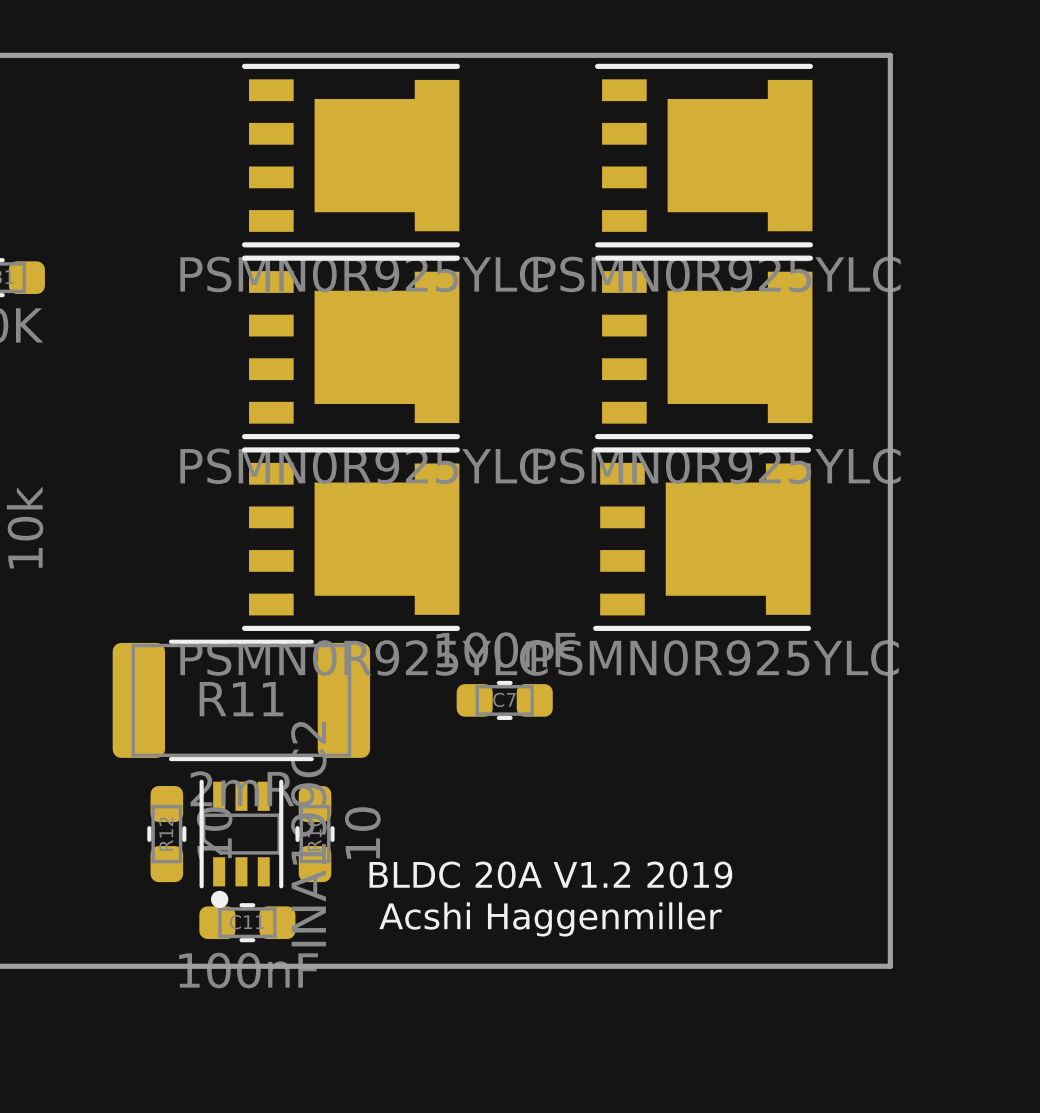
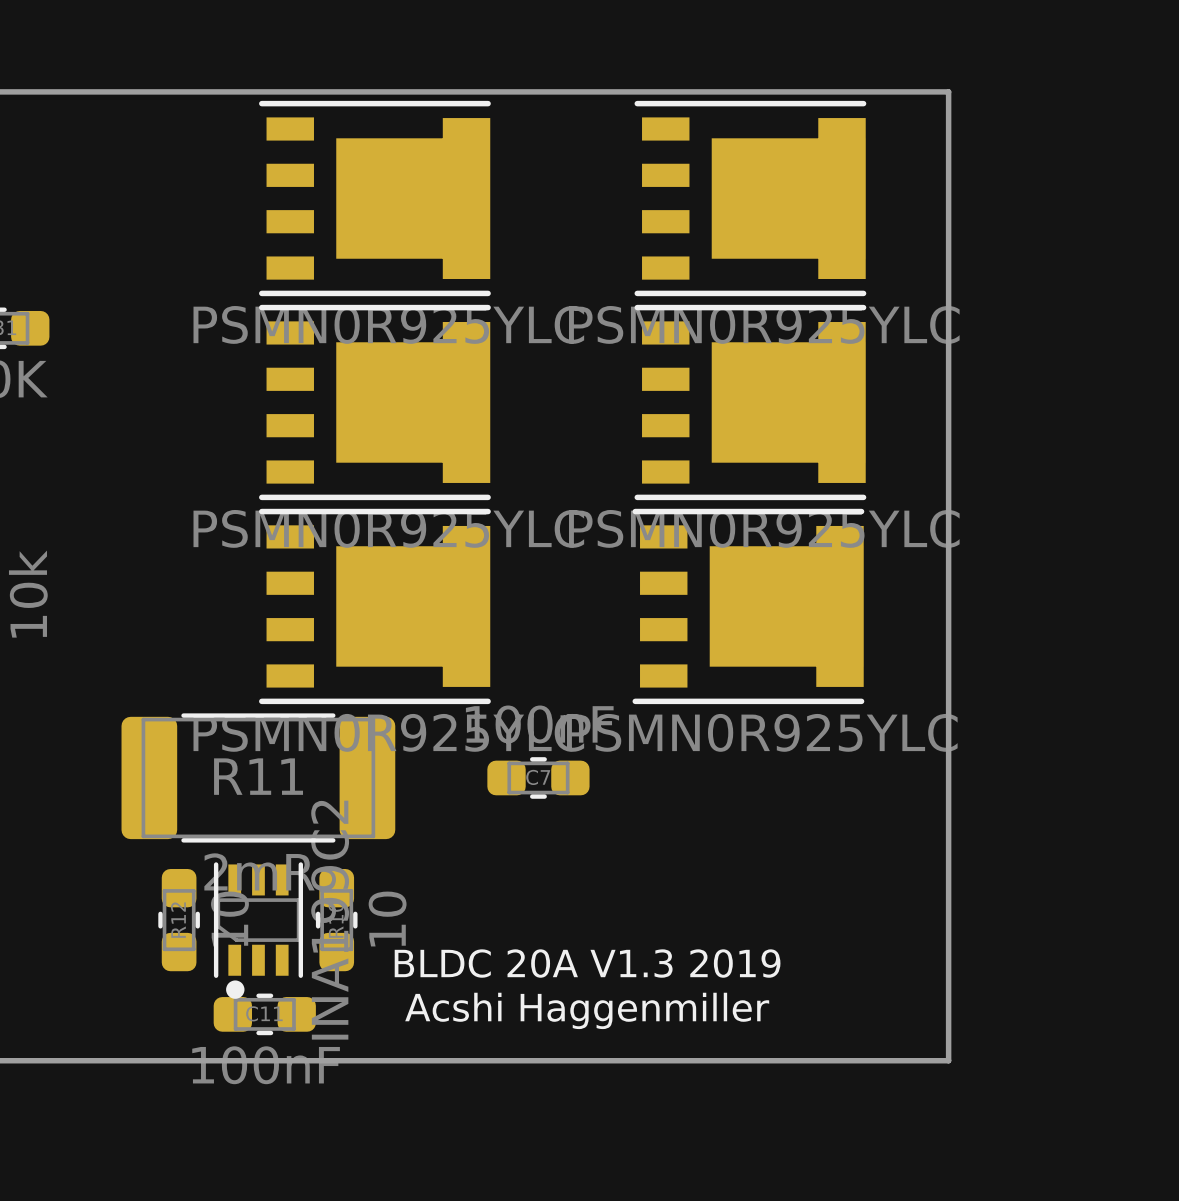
text: BLDC 20A V1.2 2019 (550, 874) -> BLDC 20A V1.3 2019 (587, 963)

